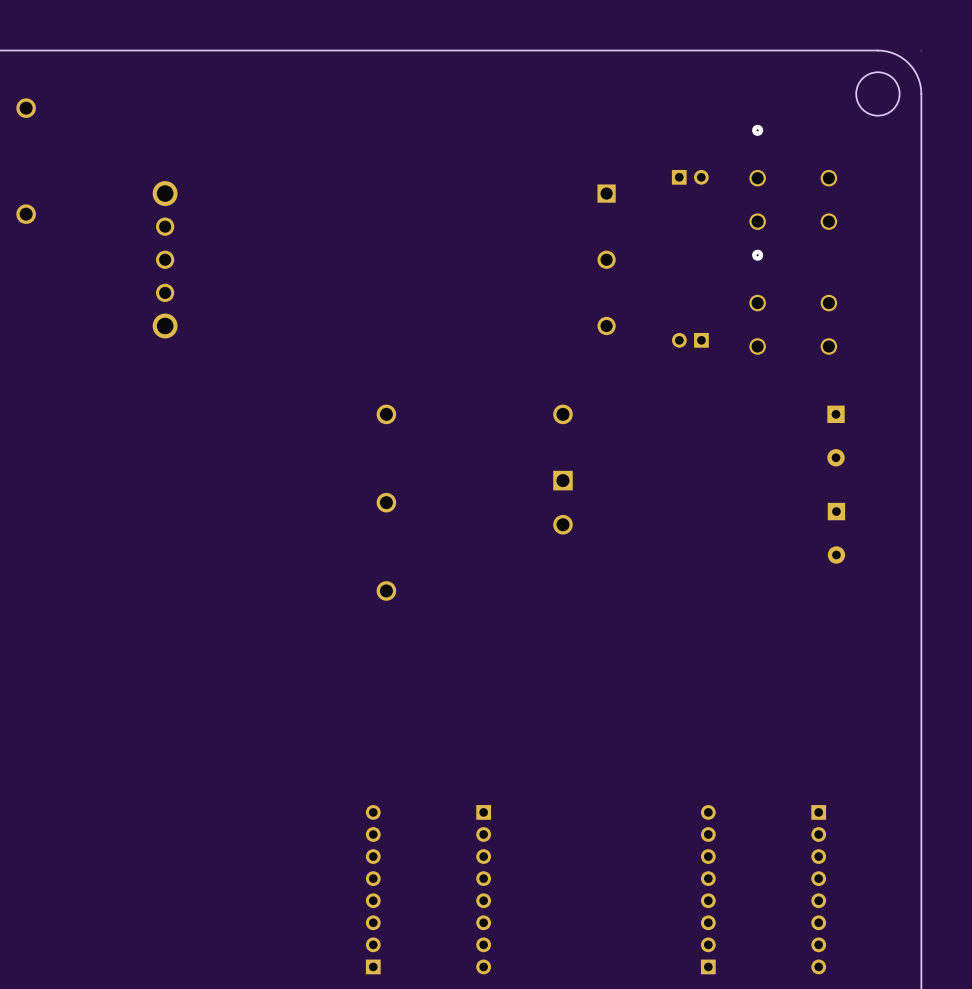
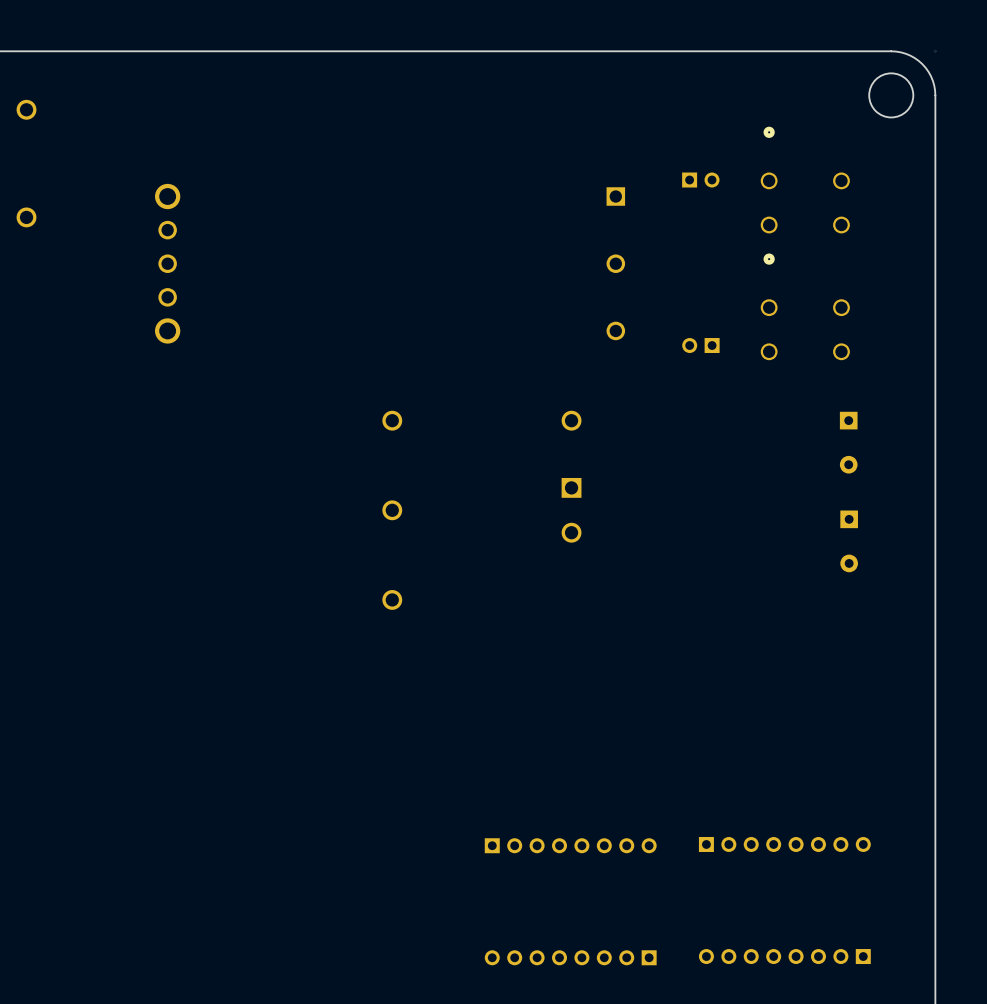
part: none -> (784, 844)
part: none -> (570, 845)
part: (373, 889) -> none
part: (483, 889) -> none
part: (708, 889) -> none
part: (818, 889) -> none
part: none -> (784, 956)
part: none -> (570, 957)

